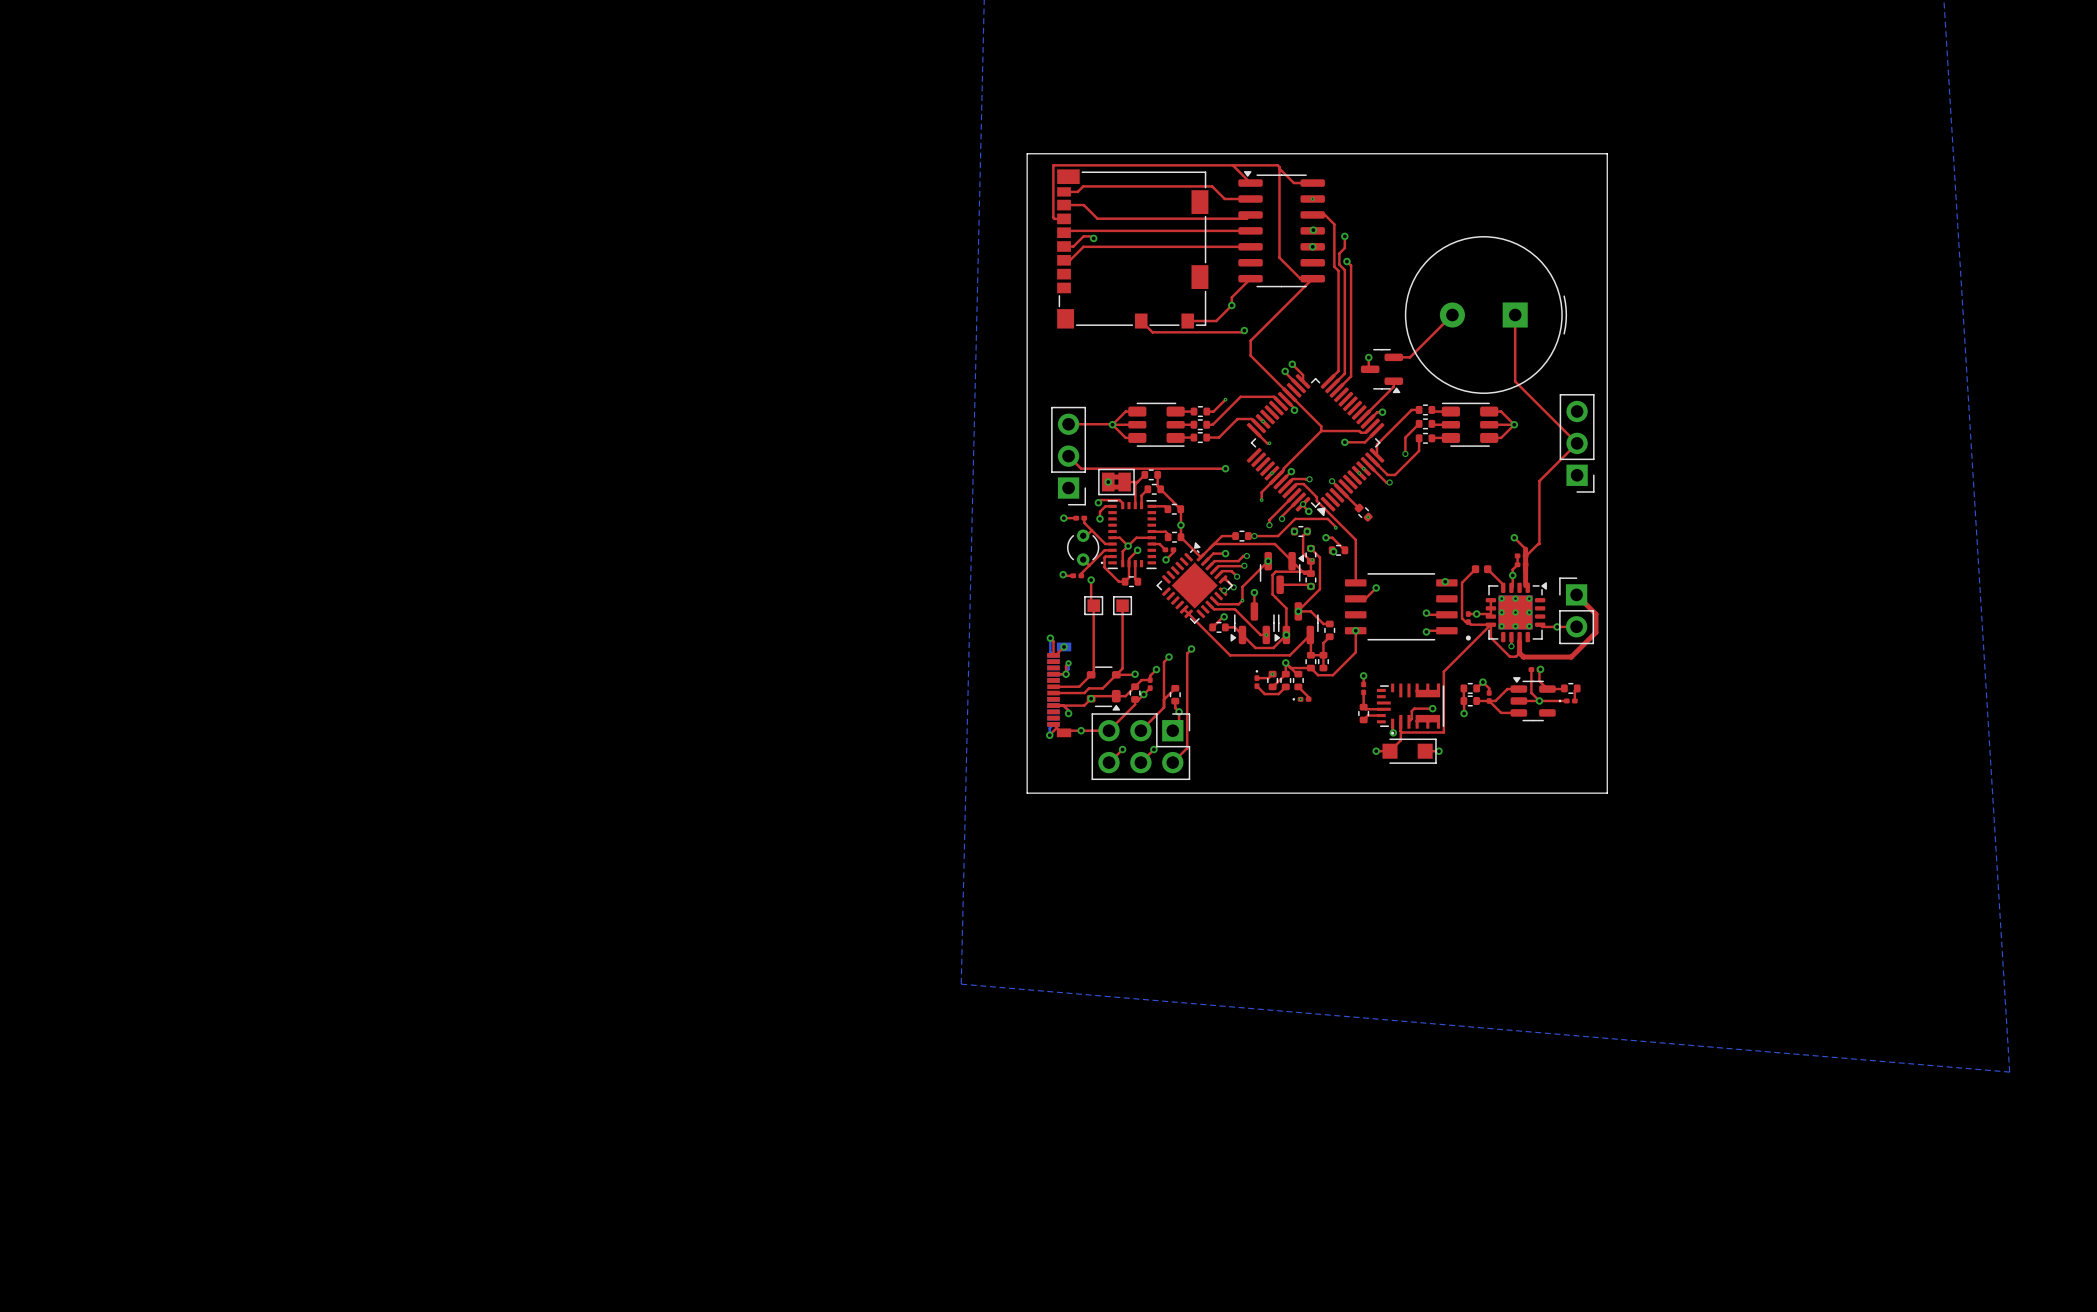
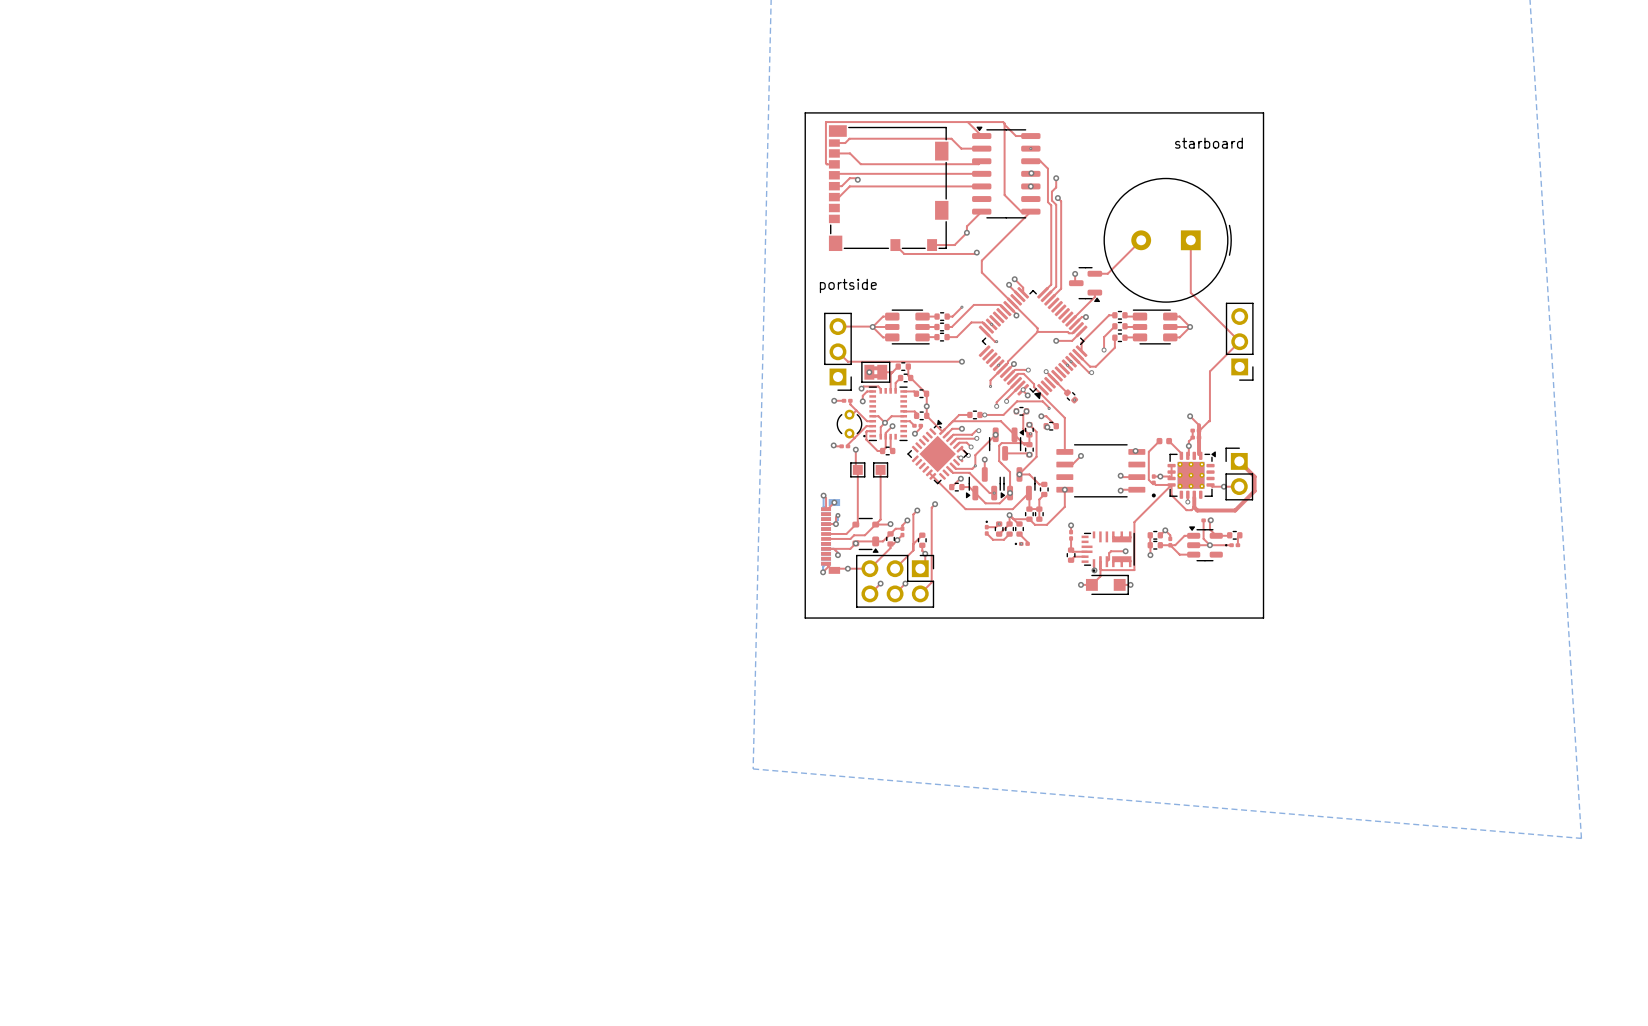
text: none -> starboard (1208, 143)
text: none -> portside (848, 285)

